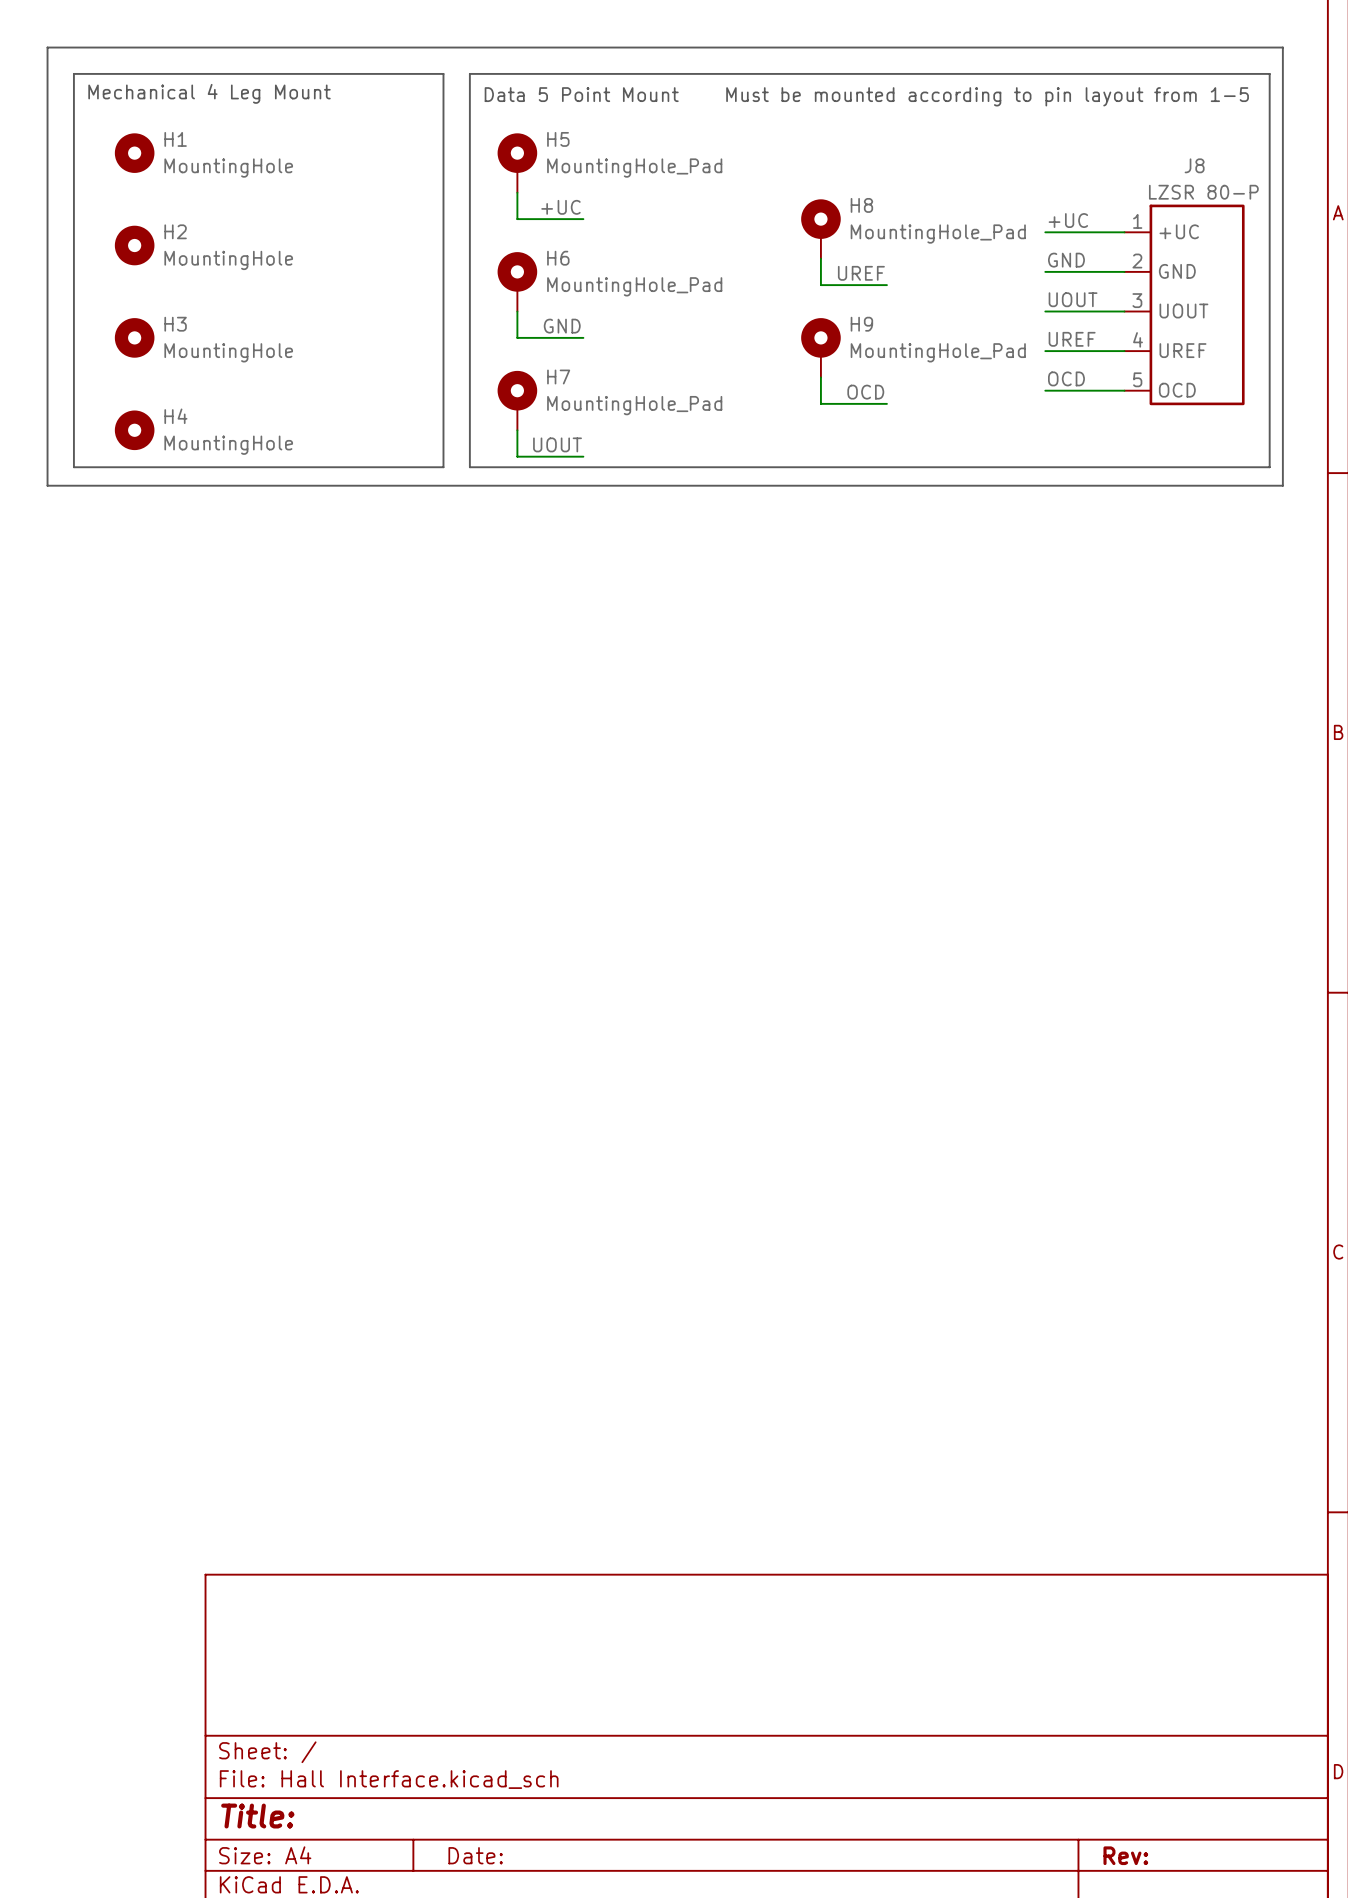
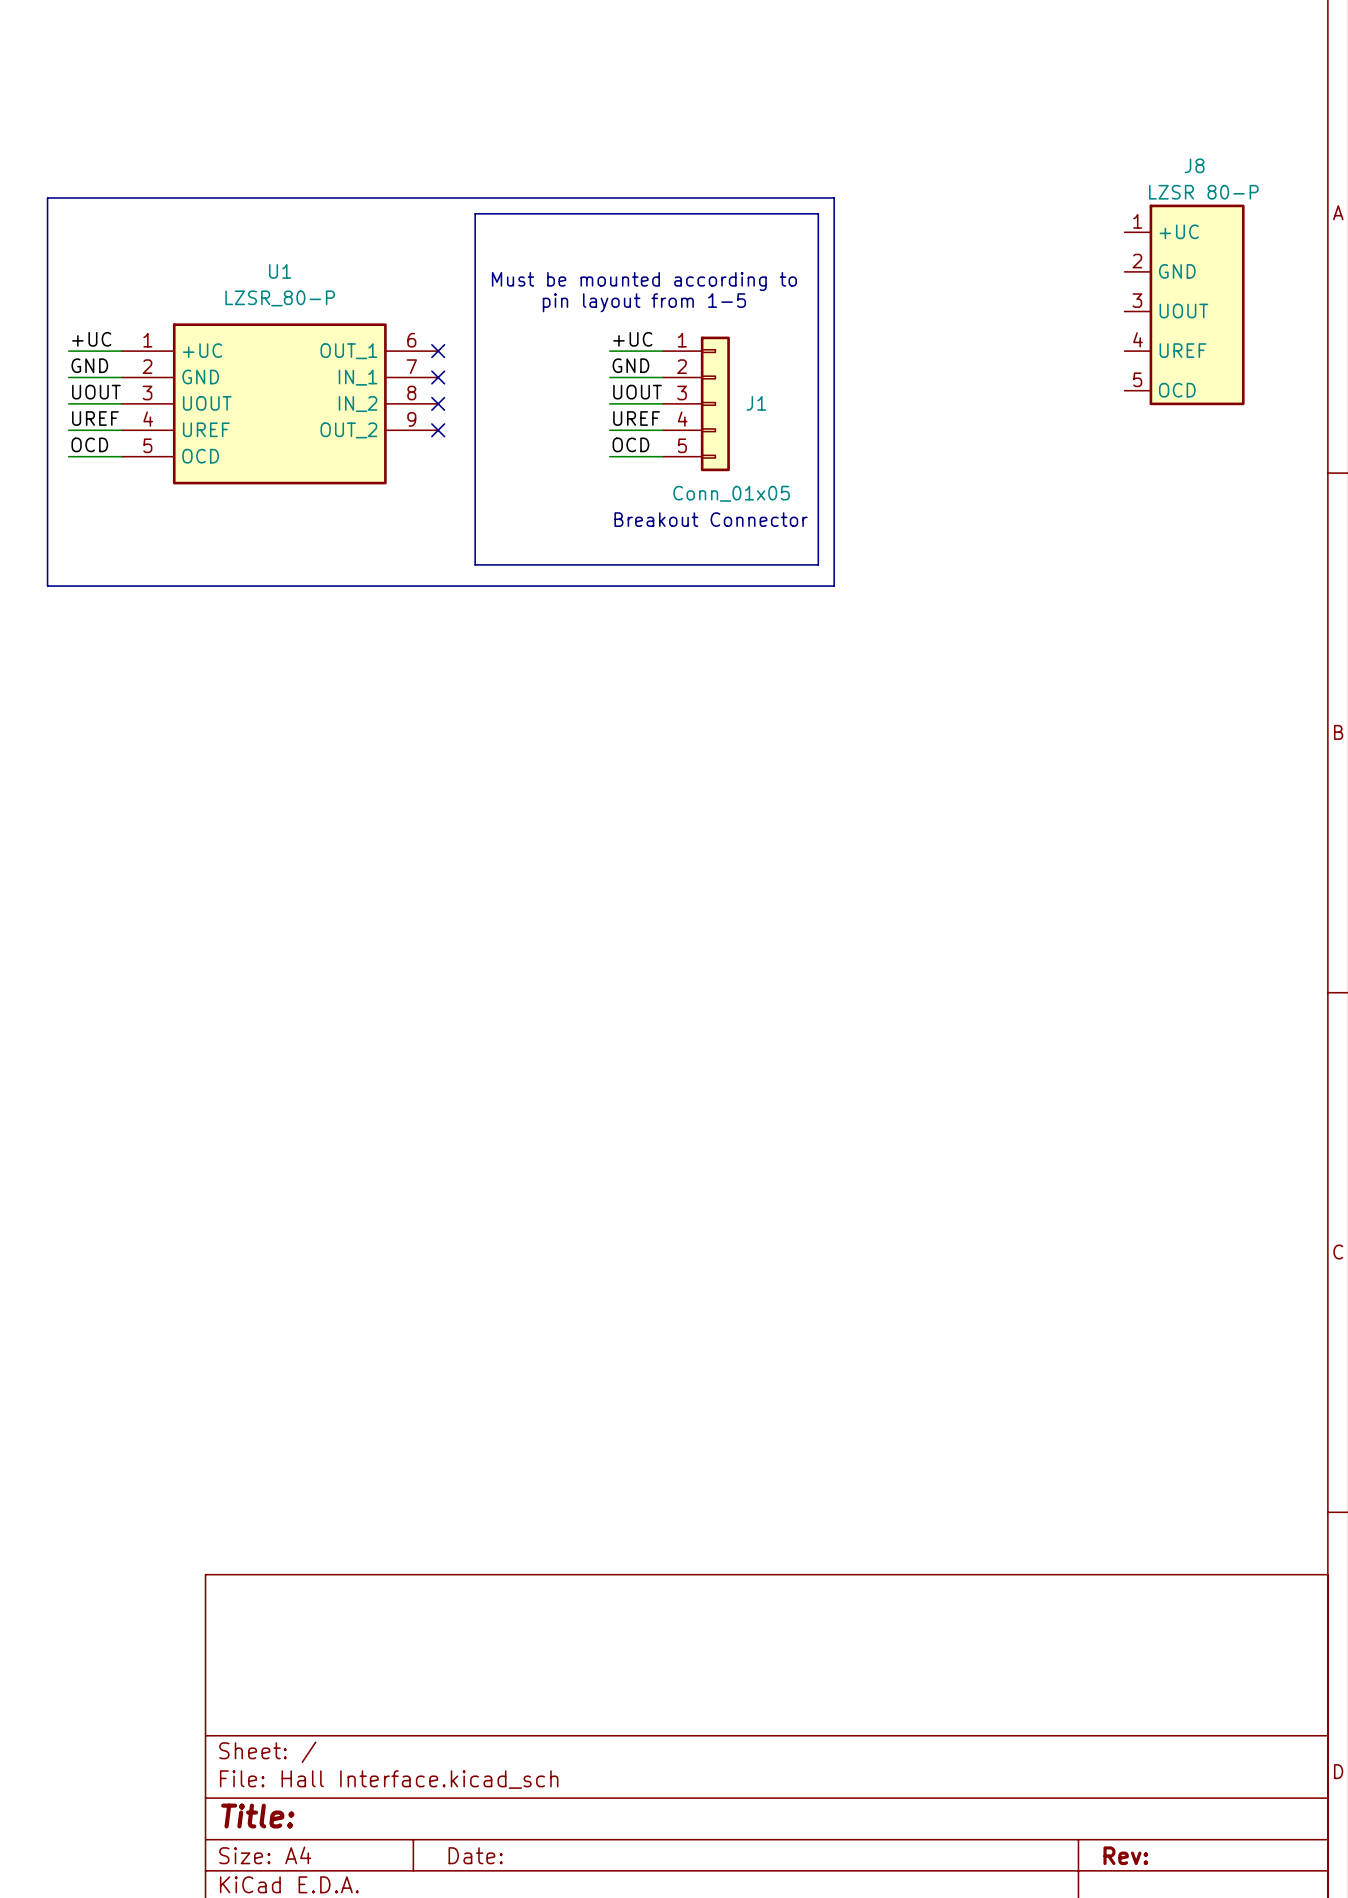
line: (73, 73) (443, 73) (443, 467) (73, 467) (73, 73) -> none
line: (469, 73) (1269, 73) (1269, 467) (469, 467) (469, 73) -> none
text: Mechanical 4 Leg Mount (209, 93) -> none
text: Data 5 Point Mount (581, 94) -> none
text: Must be mounted according to pin layout from 1-5 (987, 96) -> none
H1: MountingHole (134, 153) -> none
H5: MountingHole_Pad (517, 163) -> none
wire: (517, 192) (517, 219) (583, 219) -> none
line: (47, 198) (47, 47) (1282, 47) (1282, 485) (47, 485) -> (47, 198) (834, 198) (834, 586) (47, 586) (47, 485)
label position: +UC (560, 207) -> +UC (632, 339)
line: none -> (475, 213) (818, 213) (818, 564) (475, 564) (475, 213)
label: +UC (1068, 220) -> none
H8: MountingHole_Pad (820, 229) -> none
wire: (1045, 232) (1124, 232) -> none
H2: MountingHole (134, 245) -> none
wire: (820, 258) (820, 285) (886, 285) -> none
label: GND (1066, 260) -> none
wire: (1045, 271) (1124, 271) -> none
label: UREF (861, 273) -> none
H6: MountingHole_Pad (517, 281) -> none
text: none -> Must be mounted according to (644, 281)
label: UOUT (1073, 299) -> none
text: none -> pin layout from 1-5 (644, 302)
wire: (517, 311) (517, 337) (583, 337) -> none
wire: (1045, 311) (1124, 311) -> none
label position: GND (562, 326) -> GND (630, 365)
H3: MountingHole (134, 337) -> none
label: none -> +UC (91, 339)
label: UREF (1072, 339) -> none
H9: MountingHole_Pad (820, 347) -> none
wire: none -> (68, 351) (121, 351)
no-connect mark: none -> (438, 351)
wire: none -> (609, 351) (662, 351)
wire: (1045, 351) (1124, 351) -> none
label: none -> GND (89, 365)
wire: none -> (68, 377) (121, 377)
no-connect mark: none -> (438, 377)
wire: none -> (609, 377) (662, 377)
wire: (820, 377) (820, 403) (886, 403) -> none
label: OCD (1066, 378) -> none
wire: (1045, 390) (1124, 390) -> none
label: none -> UOUT (96, 392)
label: OCD (865, 392) -> none
H7: MountingHole_Pad (517, 400) -> none
wire: none -> (68, 403) (121, 403)
U1: none -> LZSR_80-P (279, 403)
no-connect mark: none -> (438, 403)
wire: none -> (609, 403) (662, 403)
J1: none -> Conn_01x05 (696, 403)
label: none -> UREF (95, 418)
label: none -> UREF (636, 418)
wire: none -> (68, 430) (121, 430)
H4: MountingHole (134, 430) -> none
no-connect mark: none -> (438, 430)
wire: (517, 430) (517, 456) (583, 456) -> none
wire: none -> (609, 430) (662, 430)
label: none -> OCD (89, 444)
label position: UOUT (557, 444) -> UOUT (637, 392)
label: none -> OCD (630, 444)
wire: none -> (68, 456) (121, 456)
wire: none -> (609, 456) (662, 456)
text: none -> Breakout Connector (711, 519)

